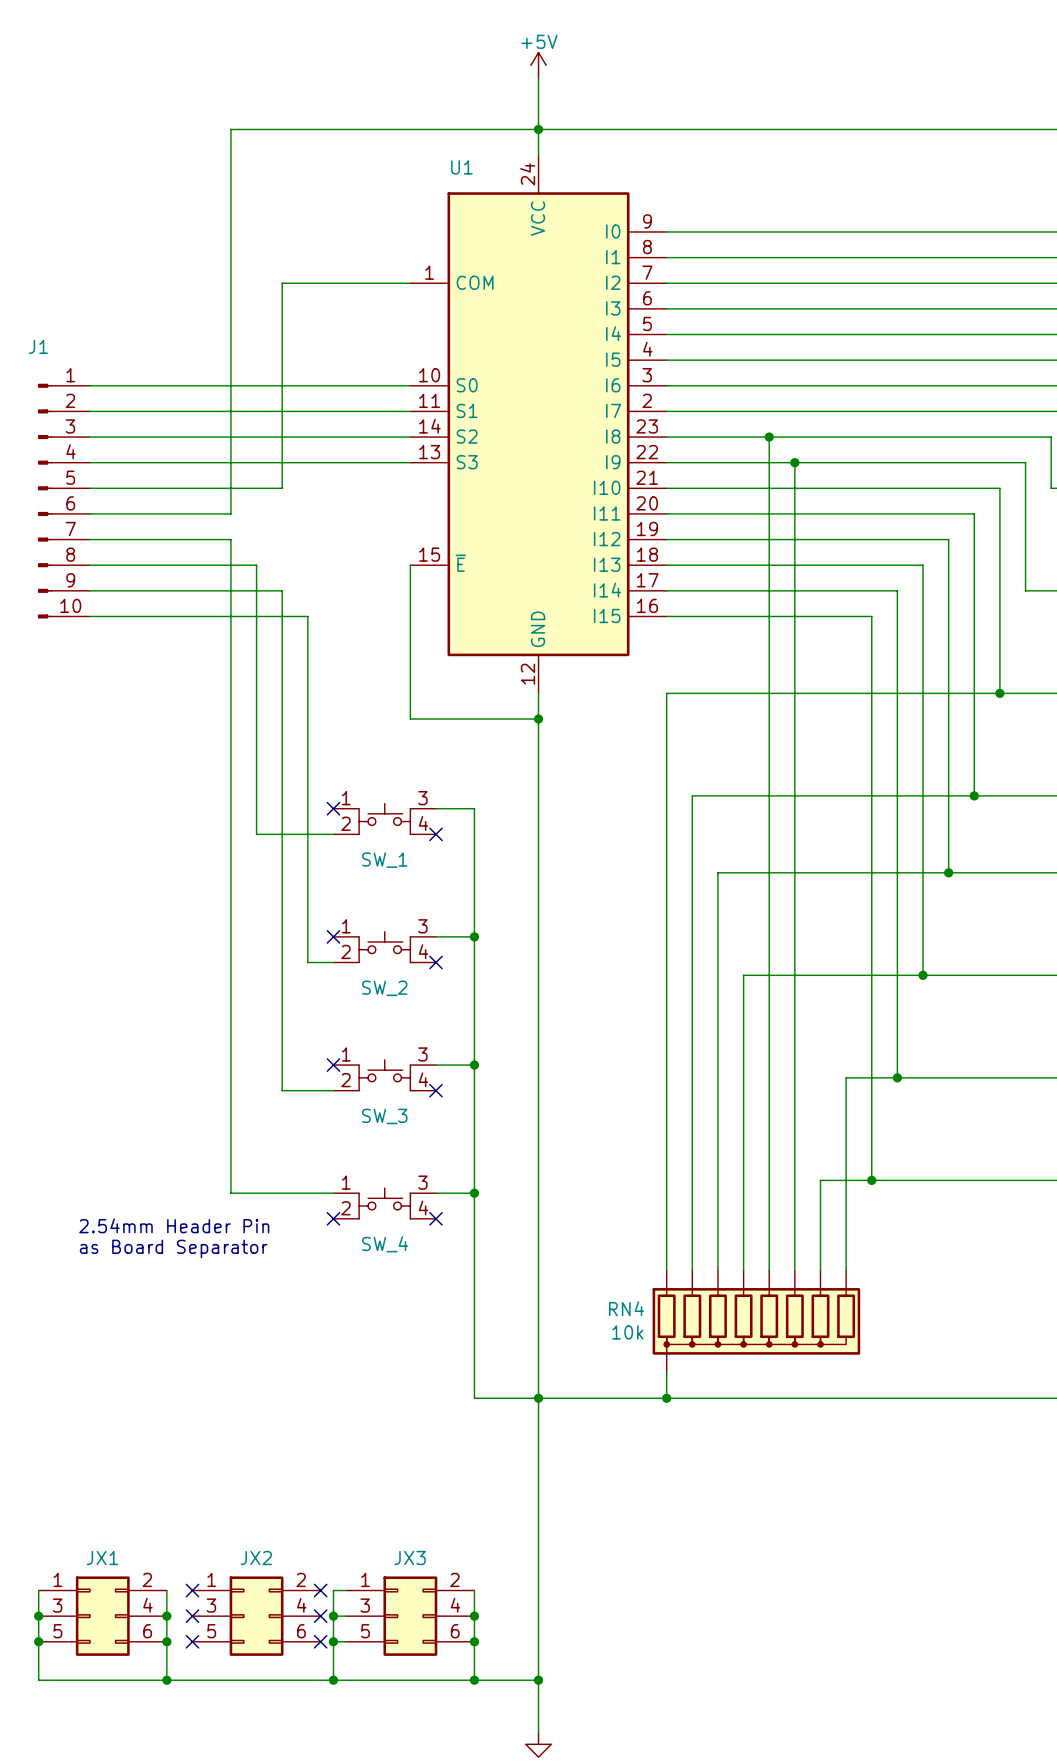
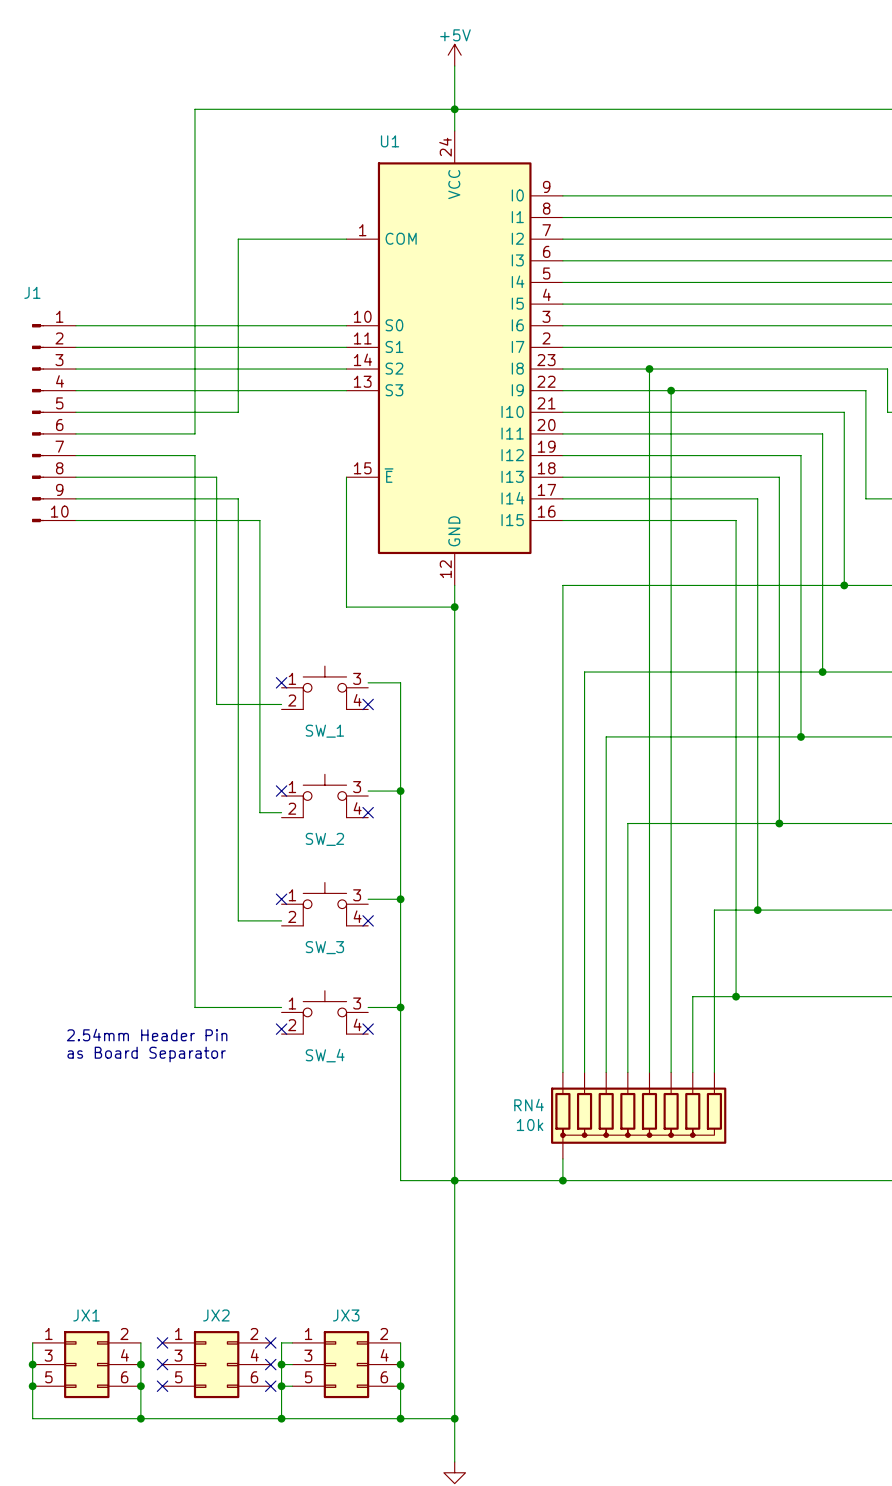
SW_1 symbol: [333, 803, 437, 835] -> [281, 666, 369, 710]
SW_2 symbol: [333, 931, 437, 963] -> [281, 774, 369, 818]
SW_3 symbol: [333, 1059, 437, 1091] -> [281, 882, 369, 926]
SW_4 symbol: [333, 1188, 437, 1219] -> [281, 990, 369, 1035]

